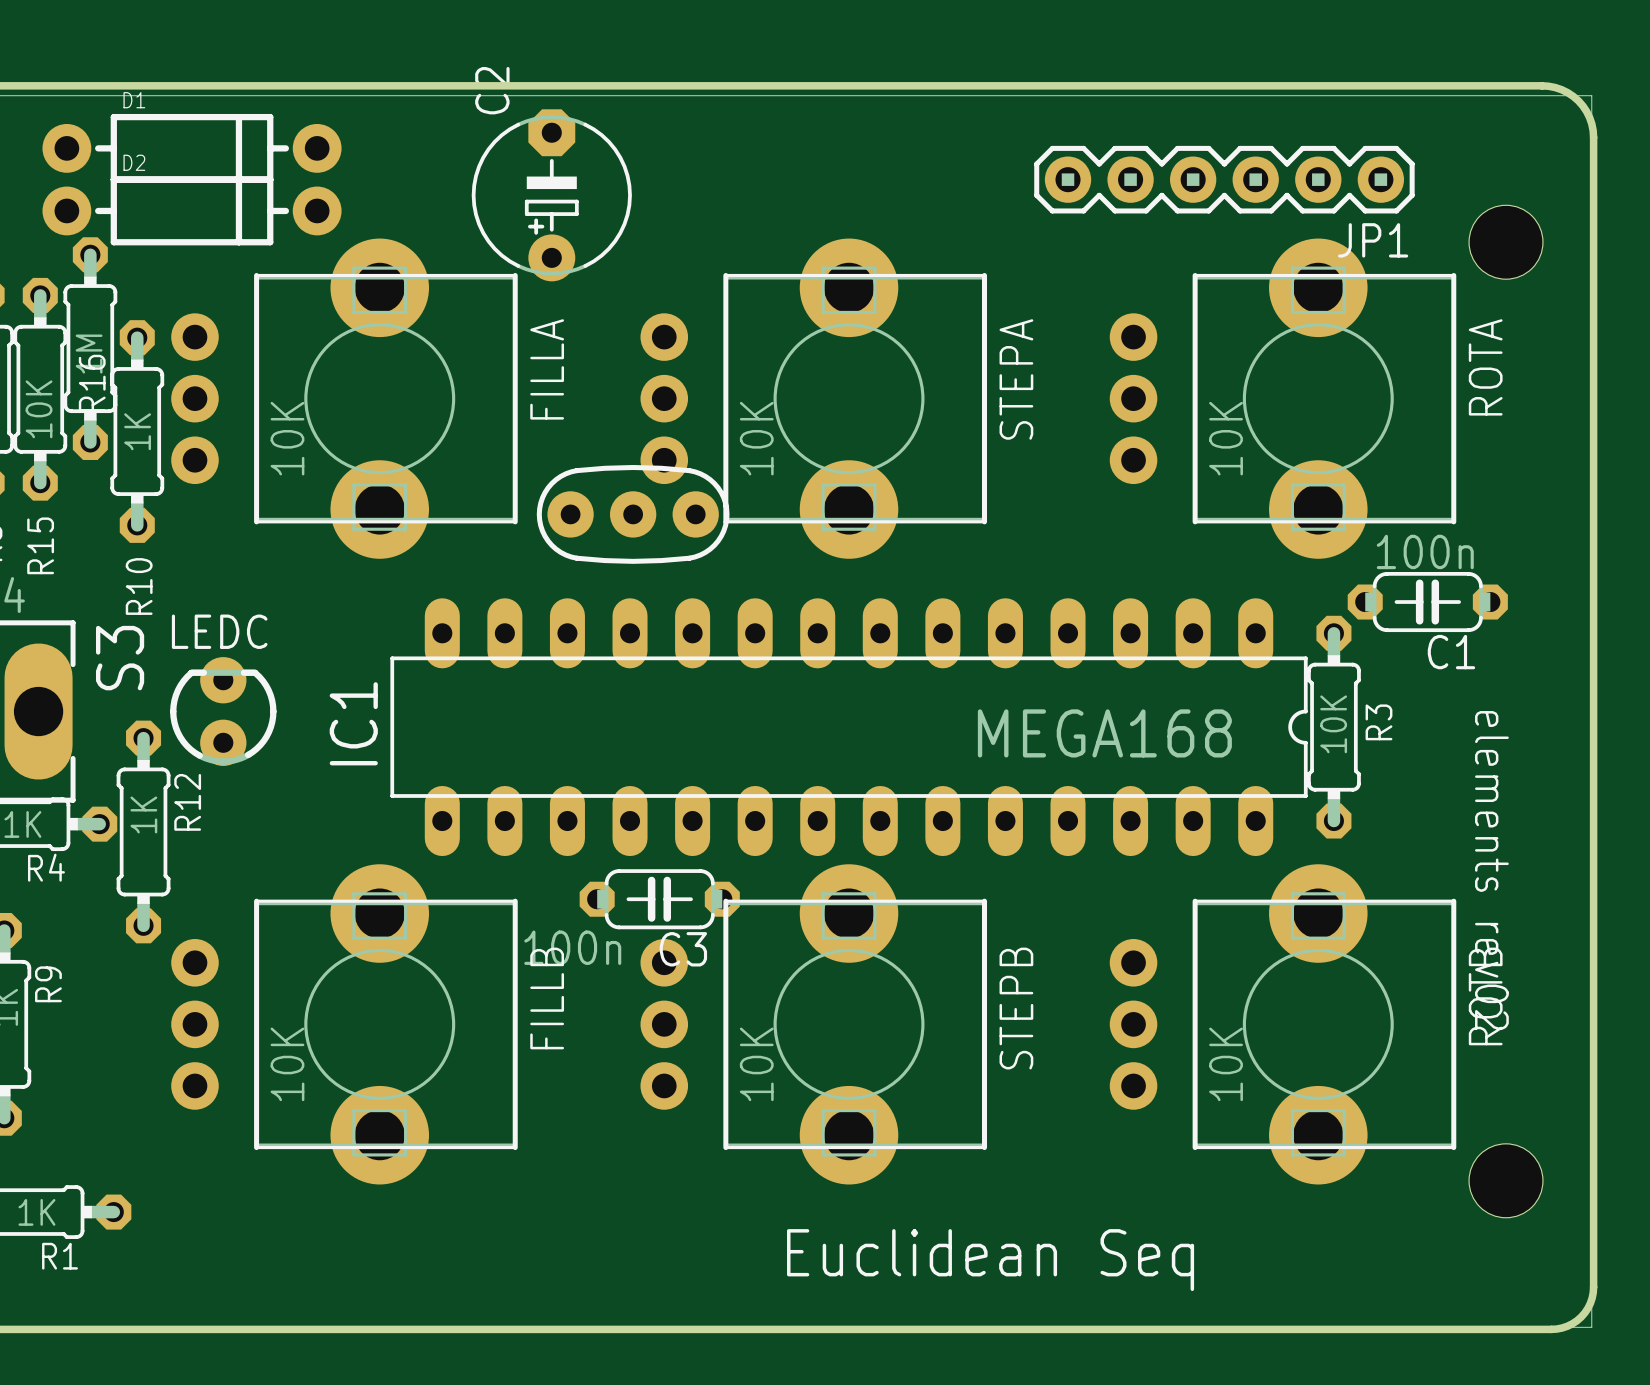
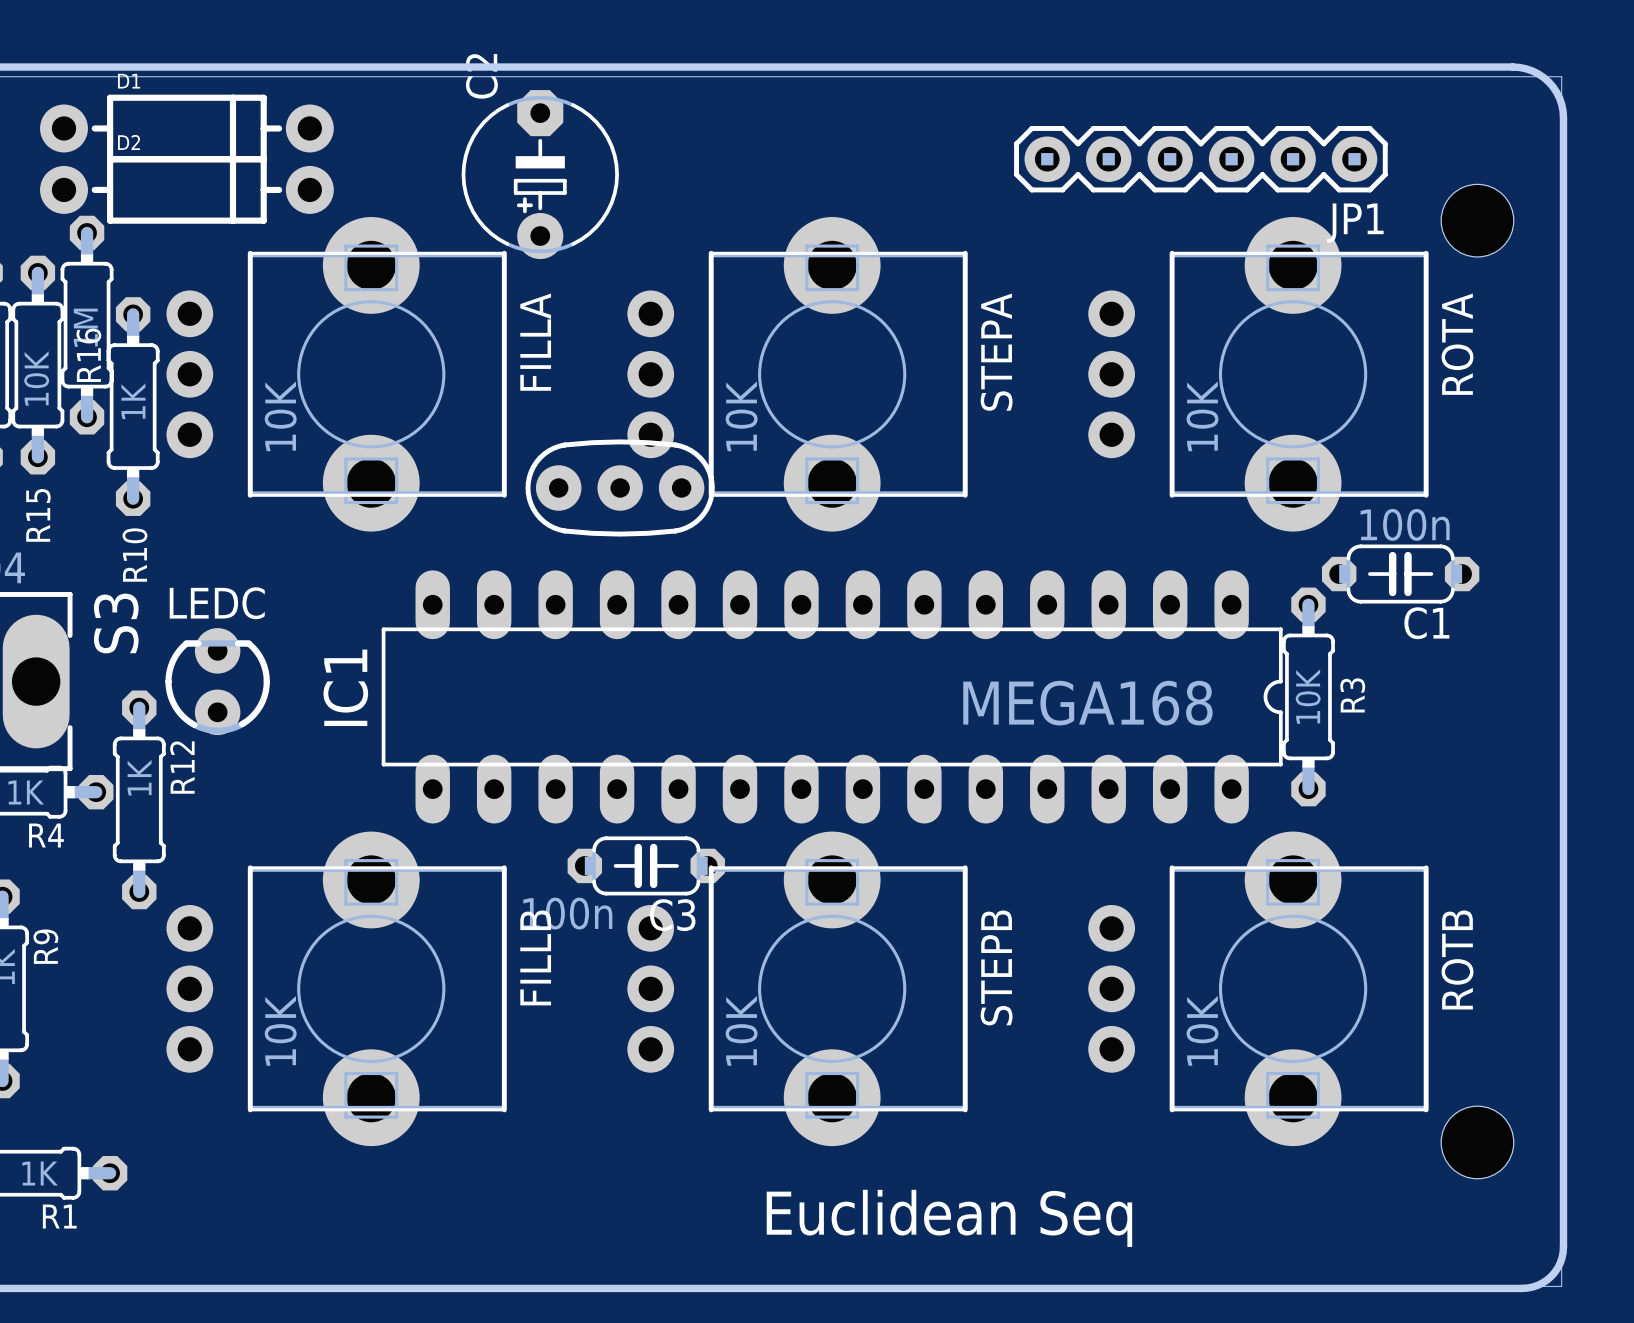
text: elements rev02 (1491, 870) -> none

